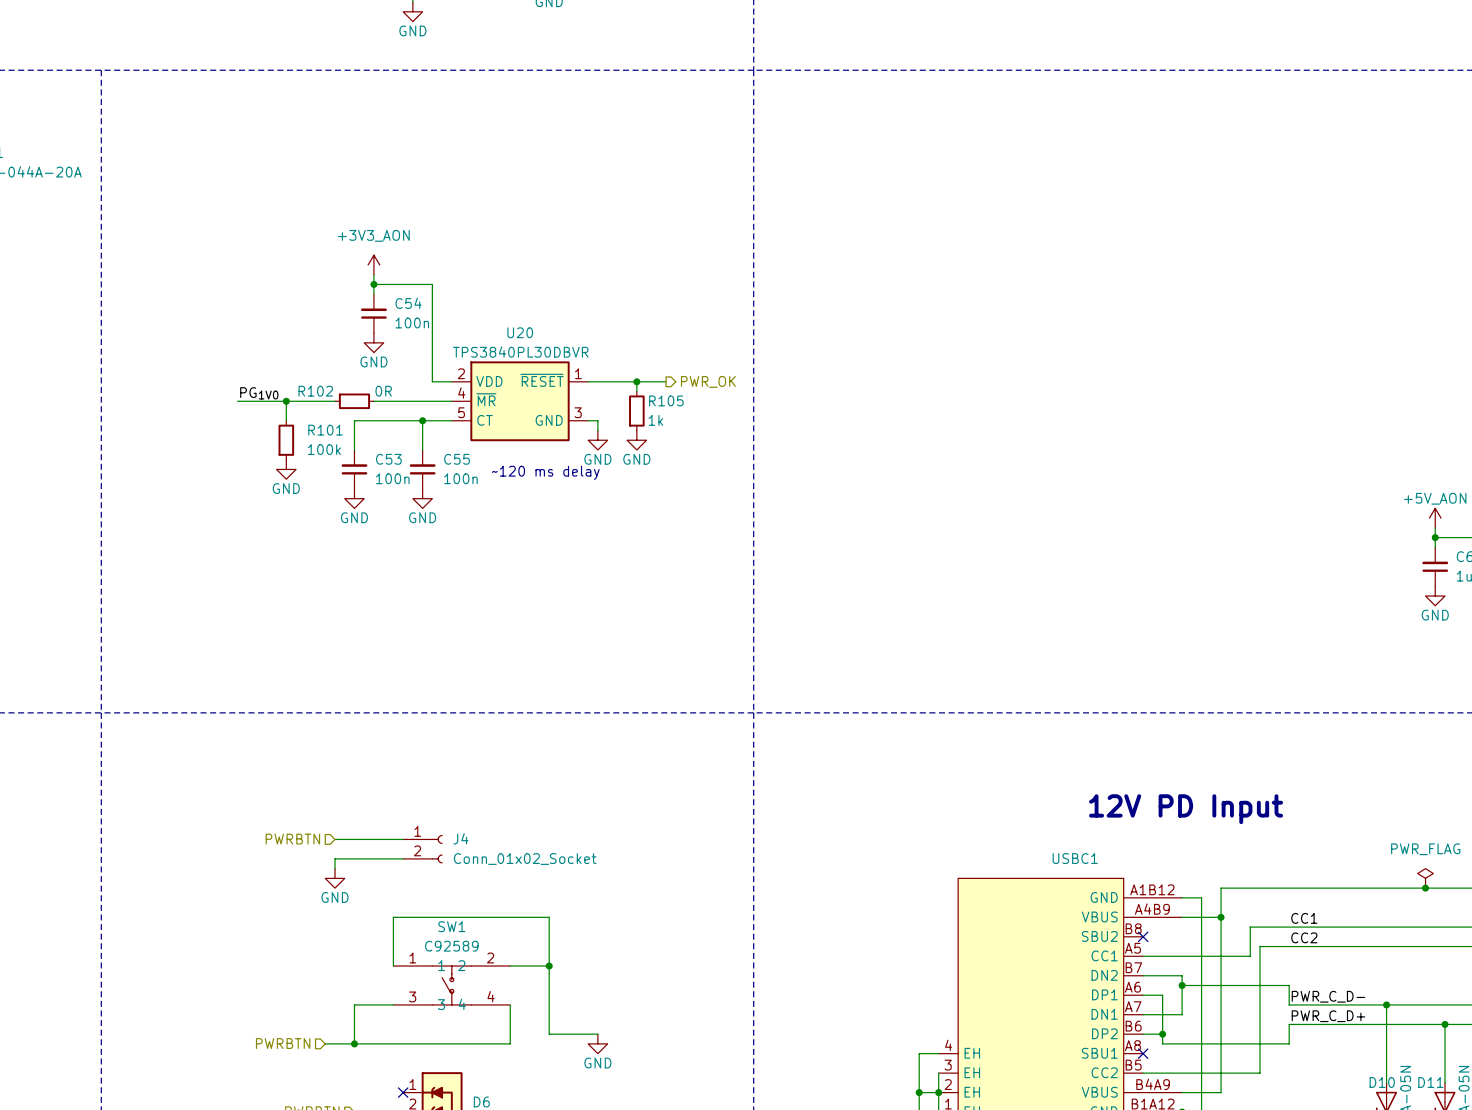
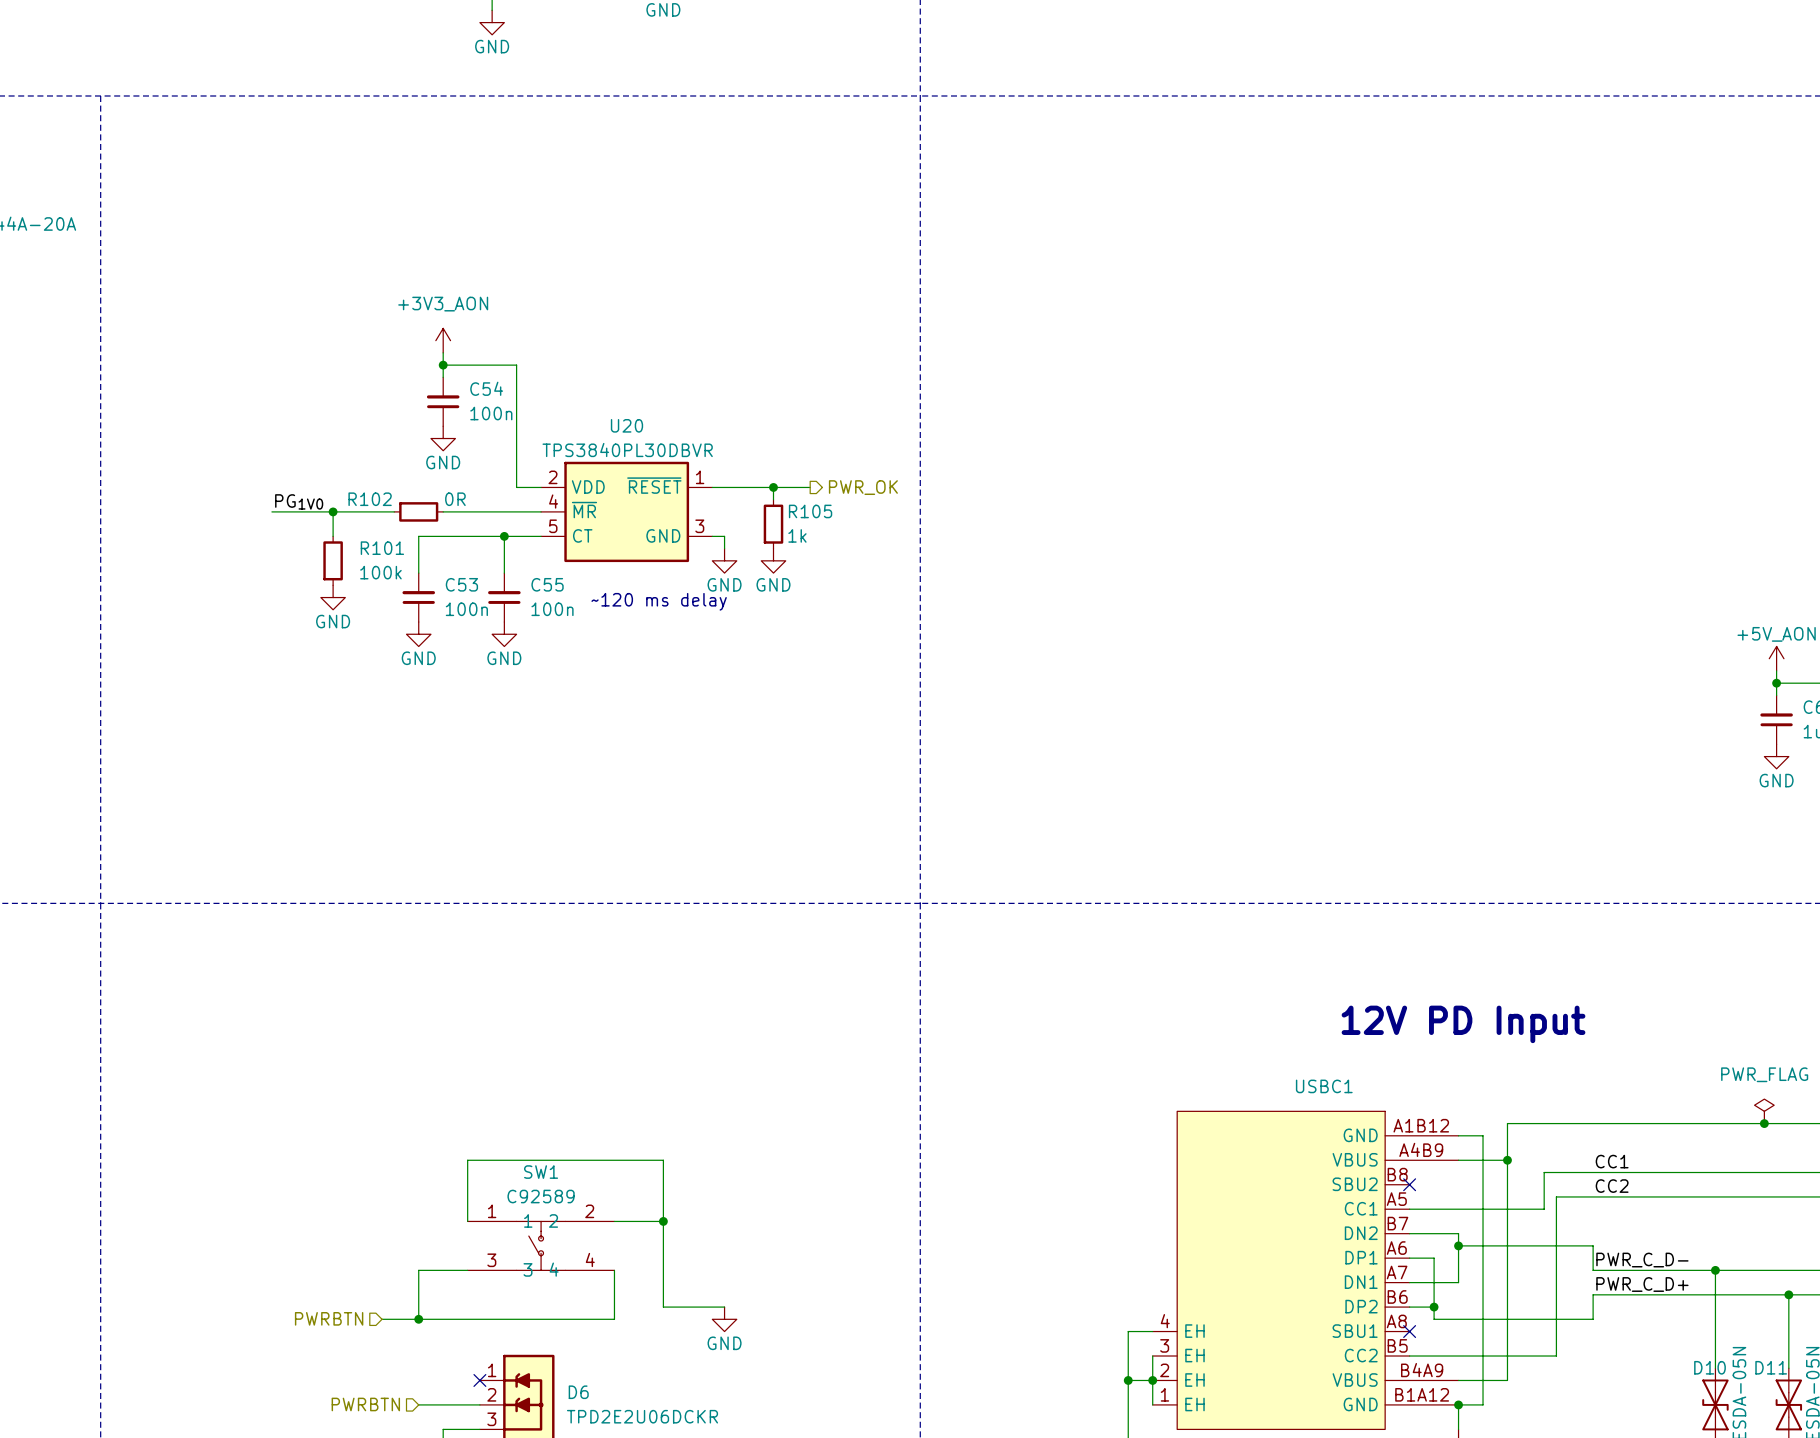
hierarchical label: PWRBTN (292, 839) -> none
wire: (335, 839) (403, 839) -> none
J4: Conn_01x02_Socket (422, 849) -> none
wire: (403, 858) (335, 858) (335, 868) -> none
power symbol: GND (335, 878) -> none

